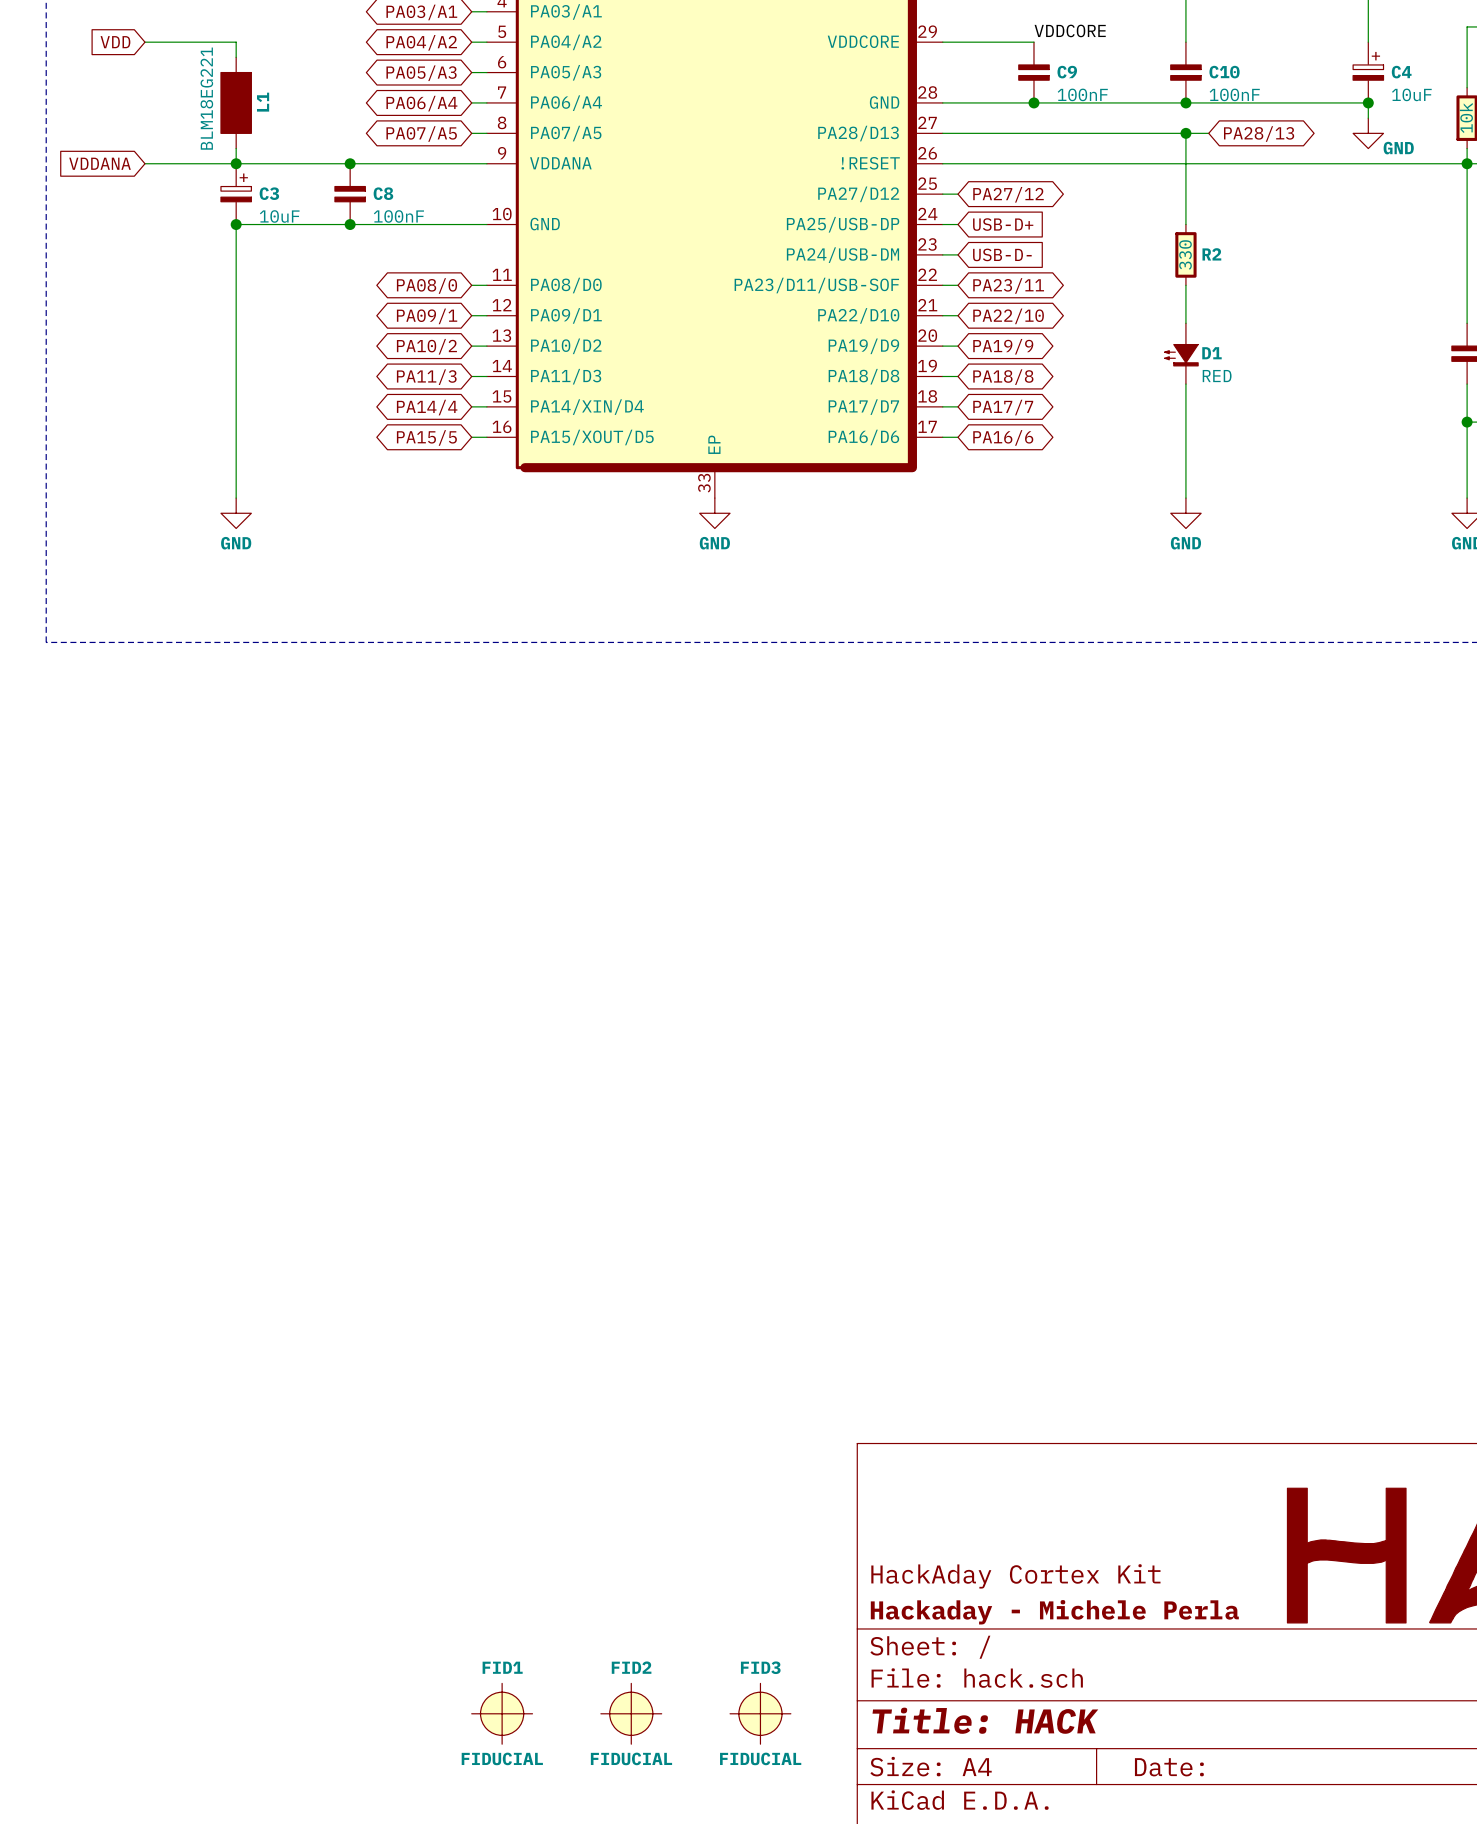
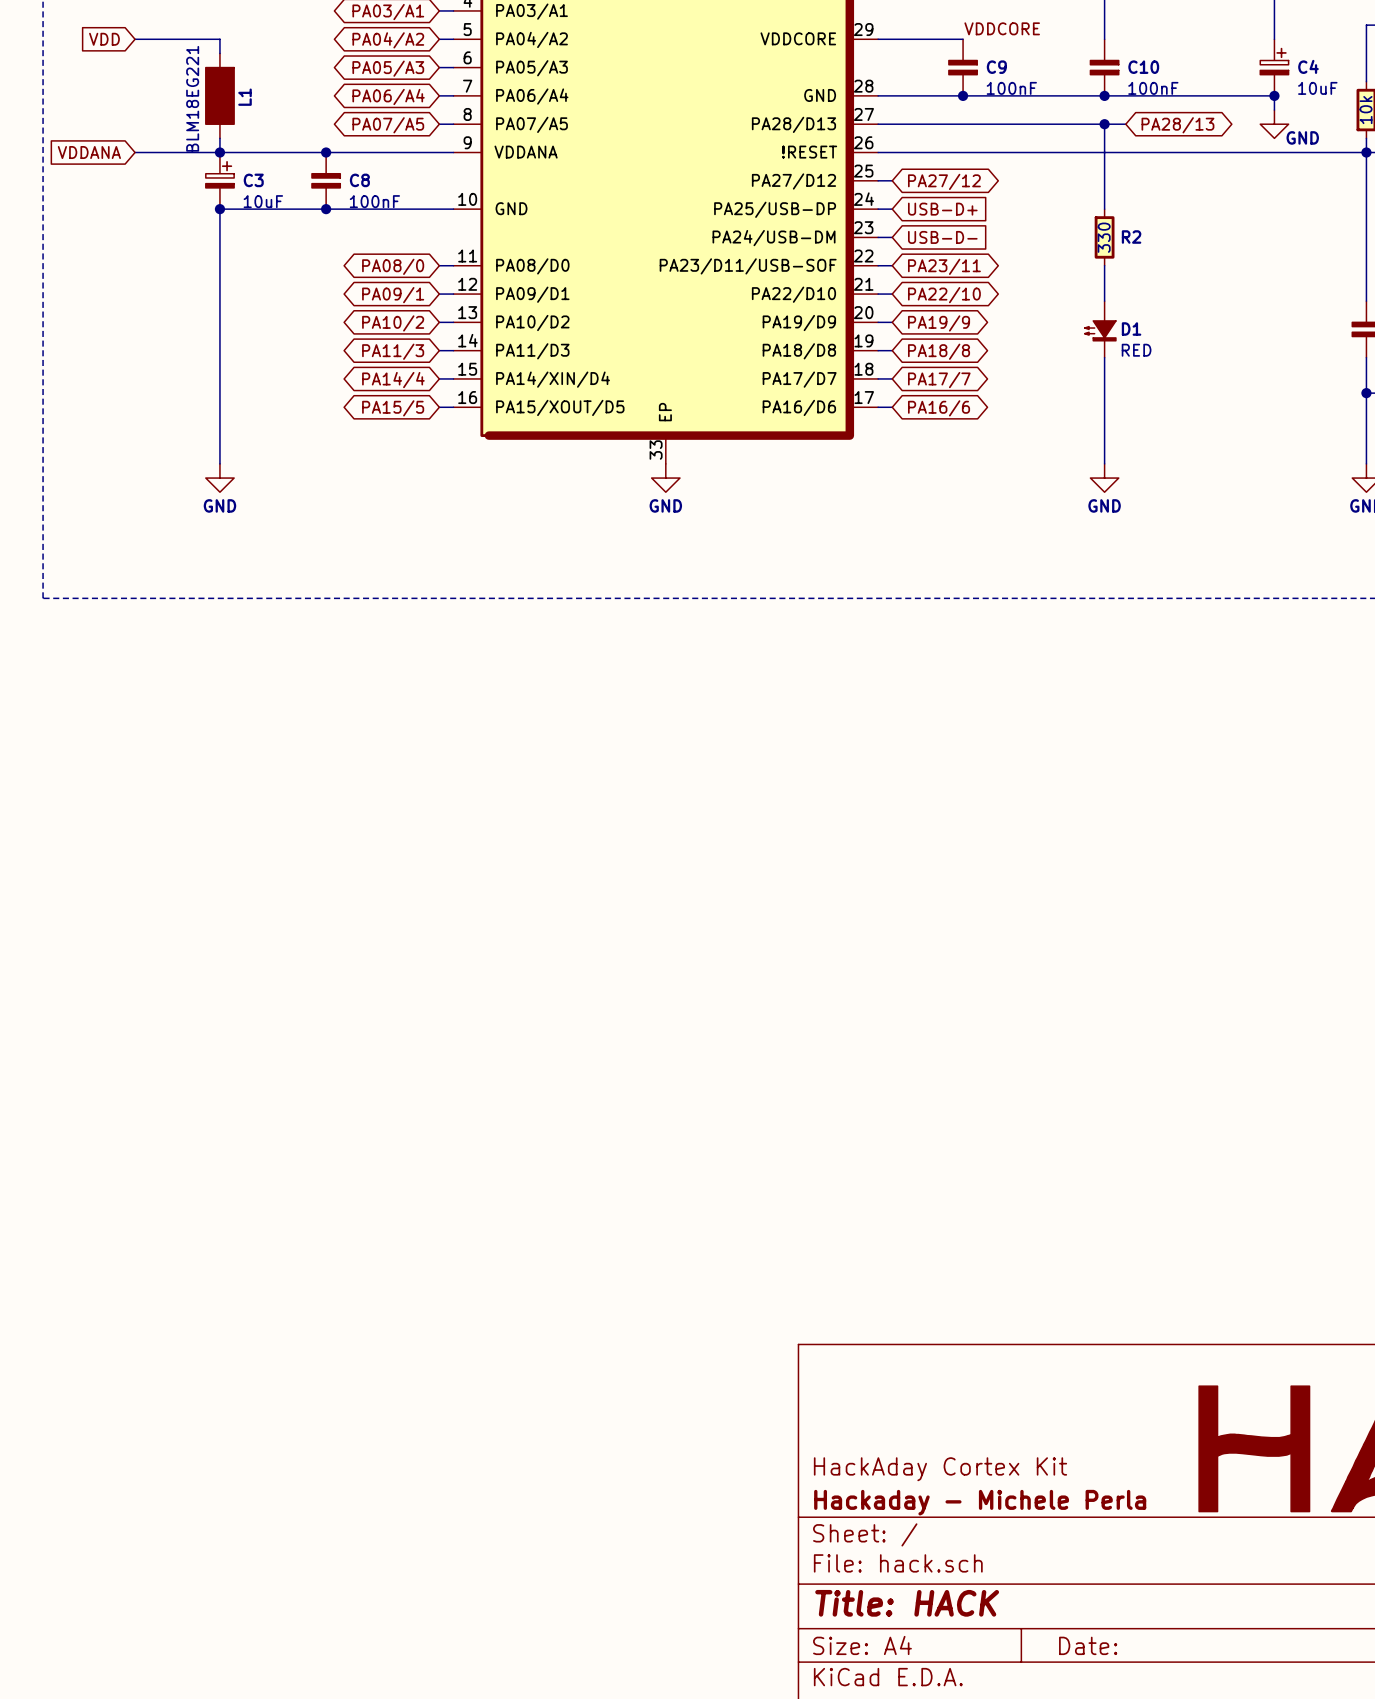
FID1: FIDUCIAL (502, 1713) -> none
FID2: FIDUCIAL (631, 1713) -> none
FID3: FIDUCIAL (760, 1713) -> none

